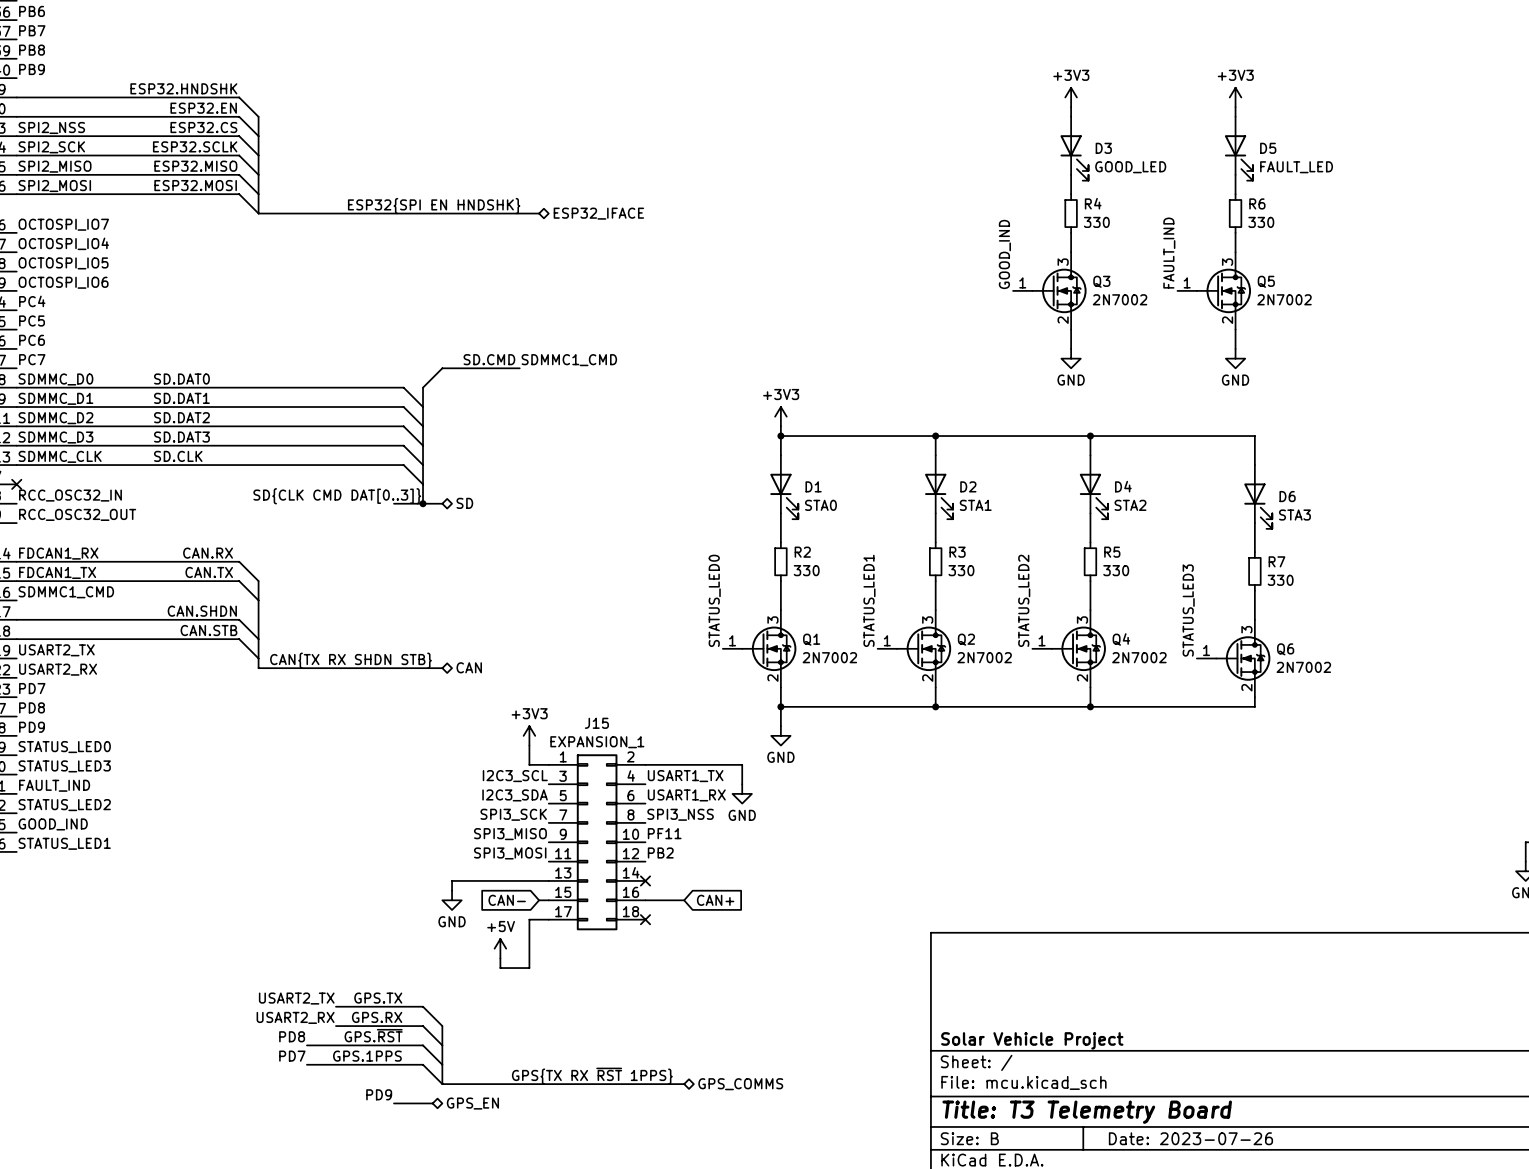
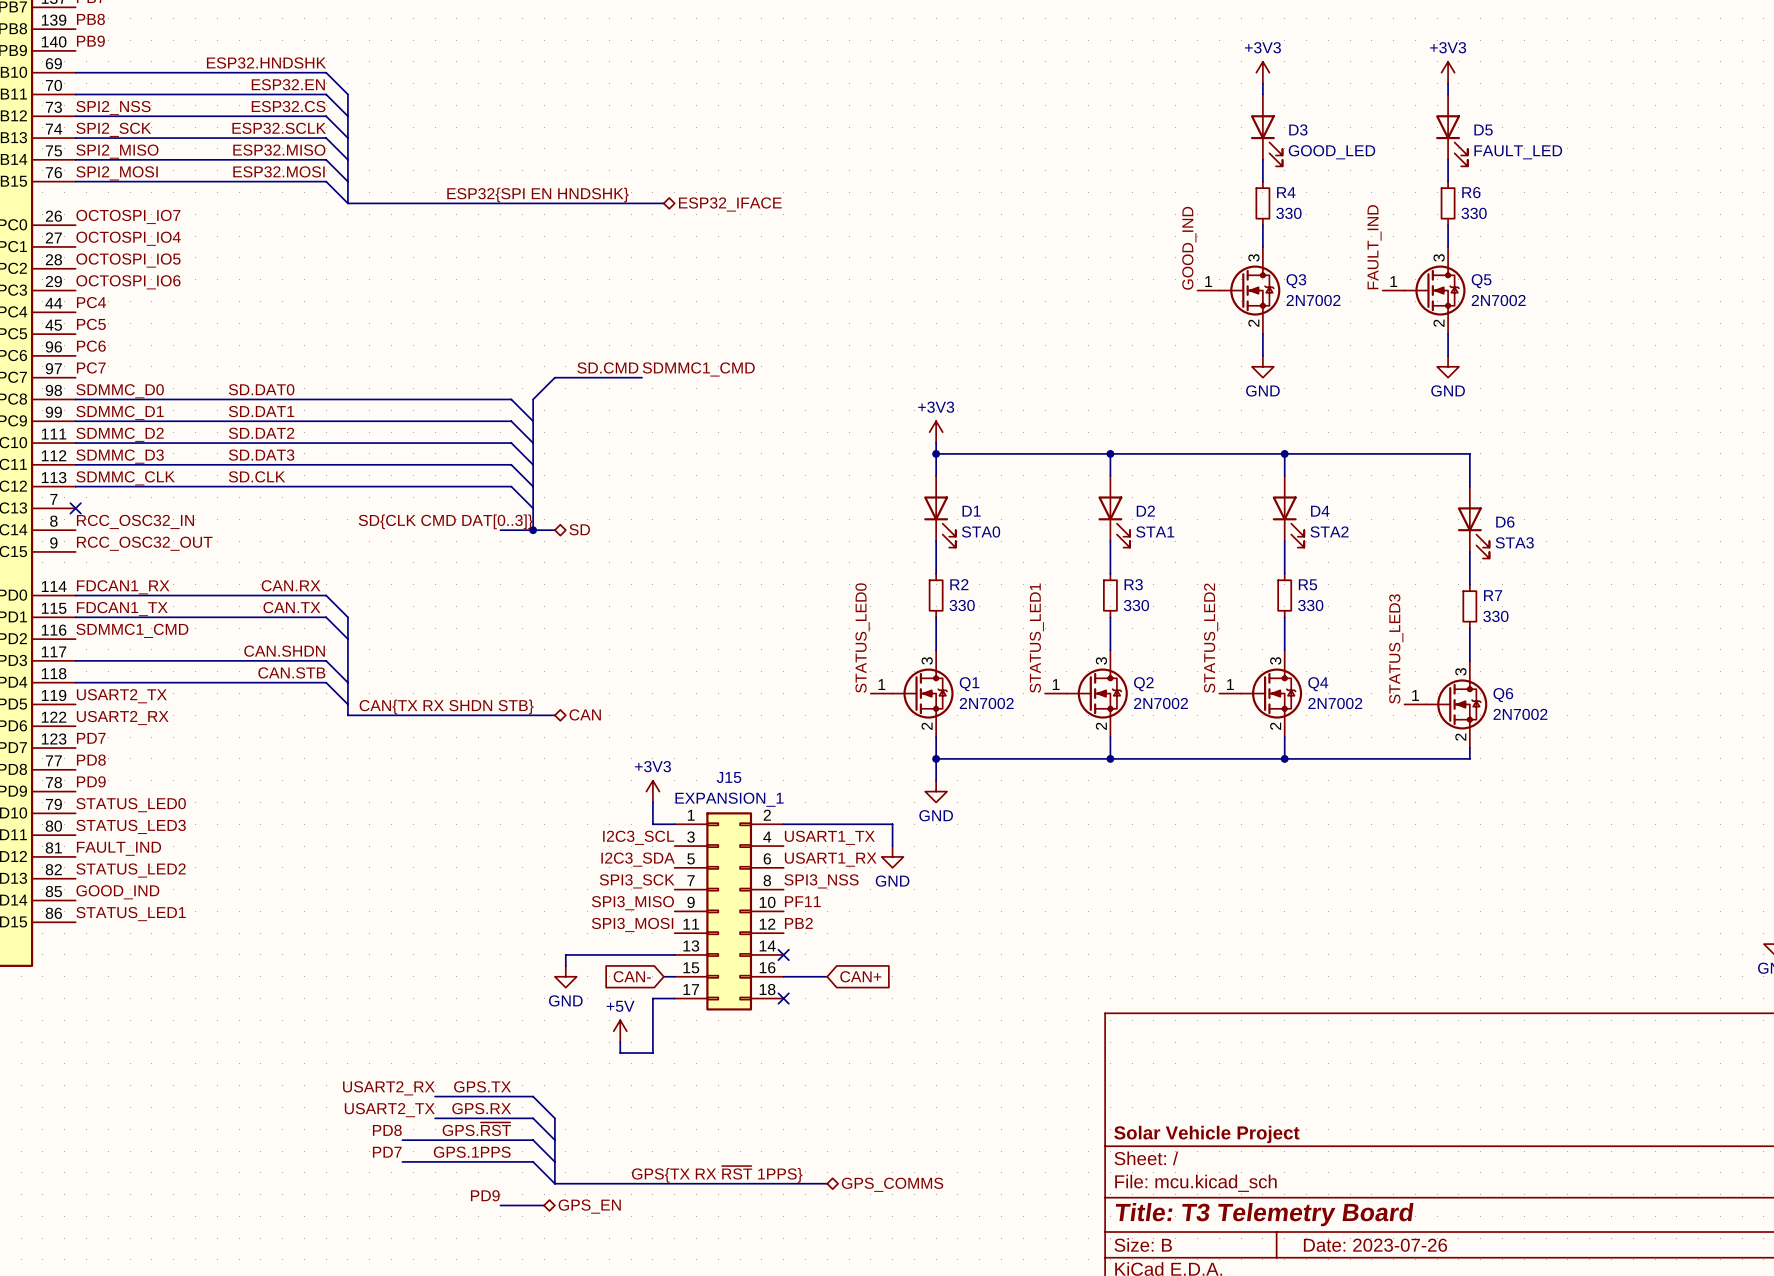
label: USART2_TX (296, 998) -> USART2_RX (388, 1088)
label: USART2_RX (295, 1017) -> USART2_TX (389, 1110)

